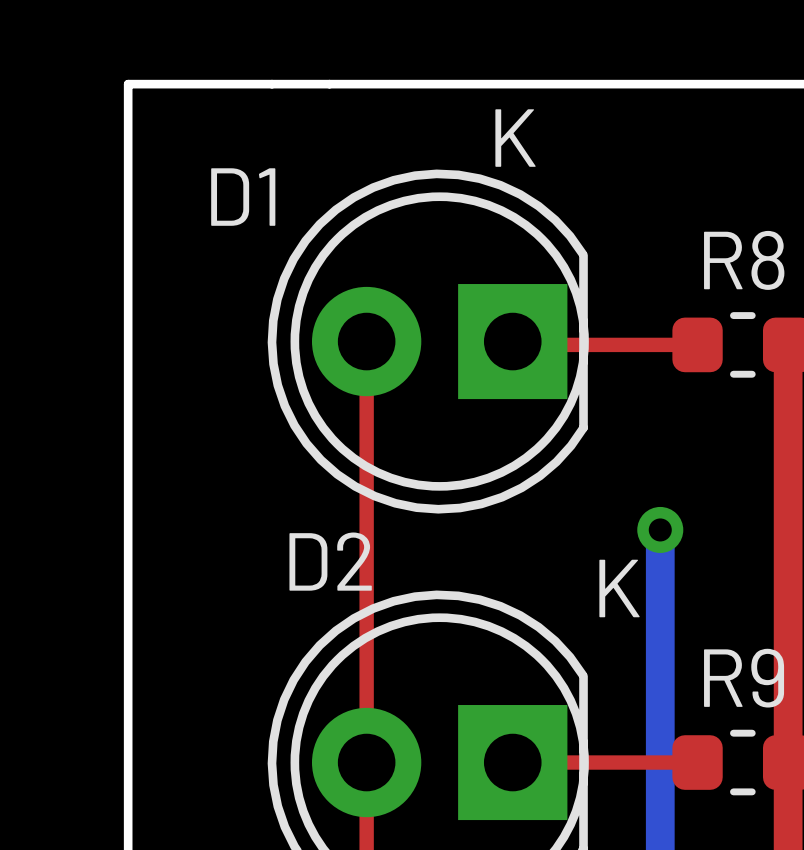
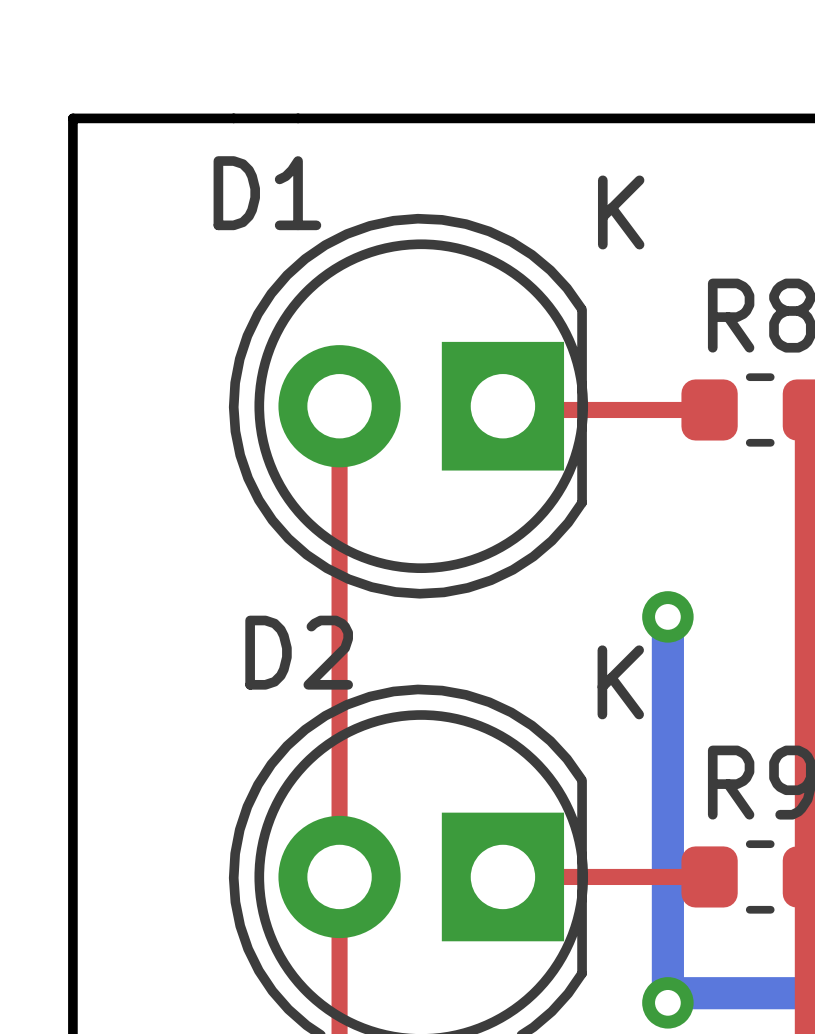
D1 text position: K (515, 138) -> K (621, 212)
D1 name position: D1 (243, 197) -> D1 (267, 193)

